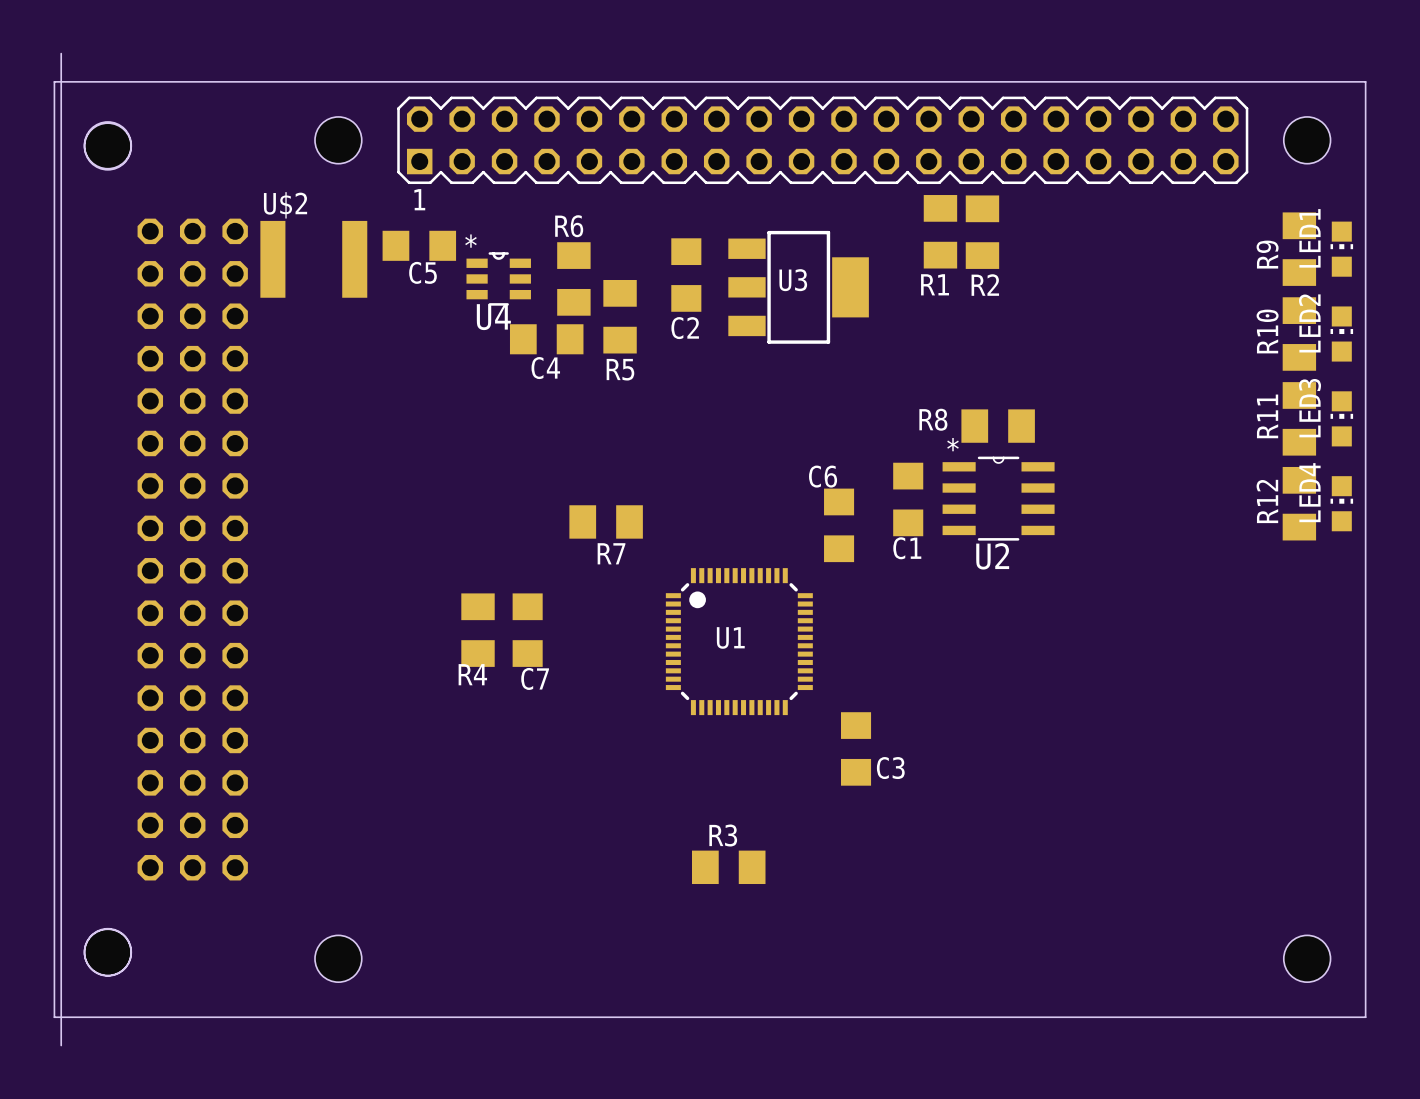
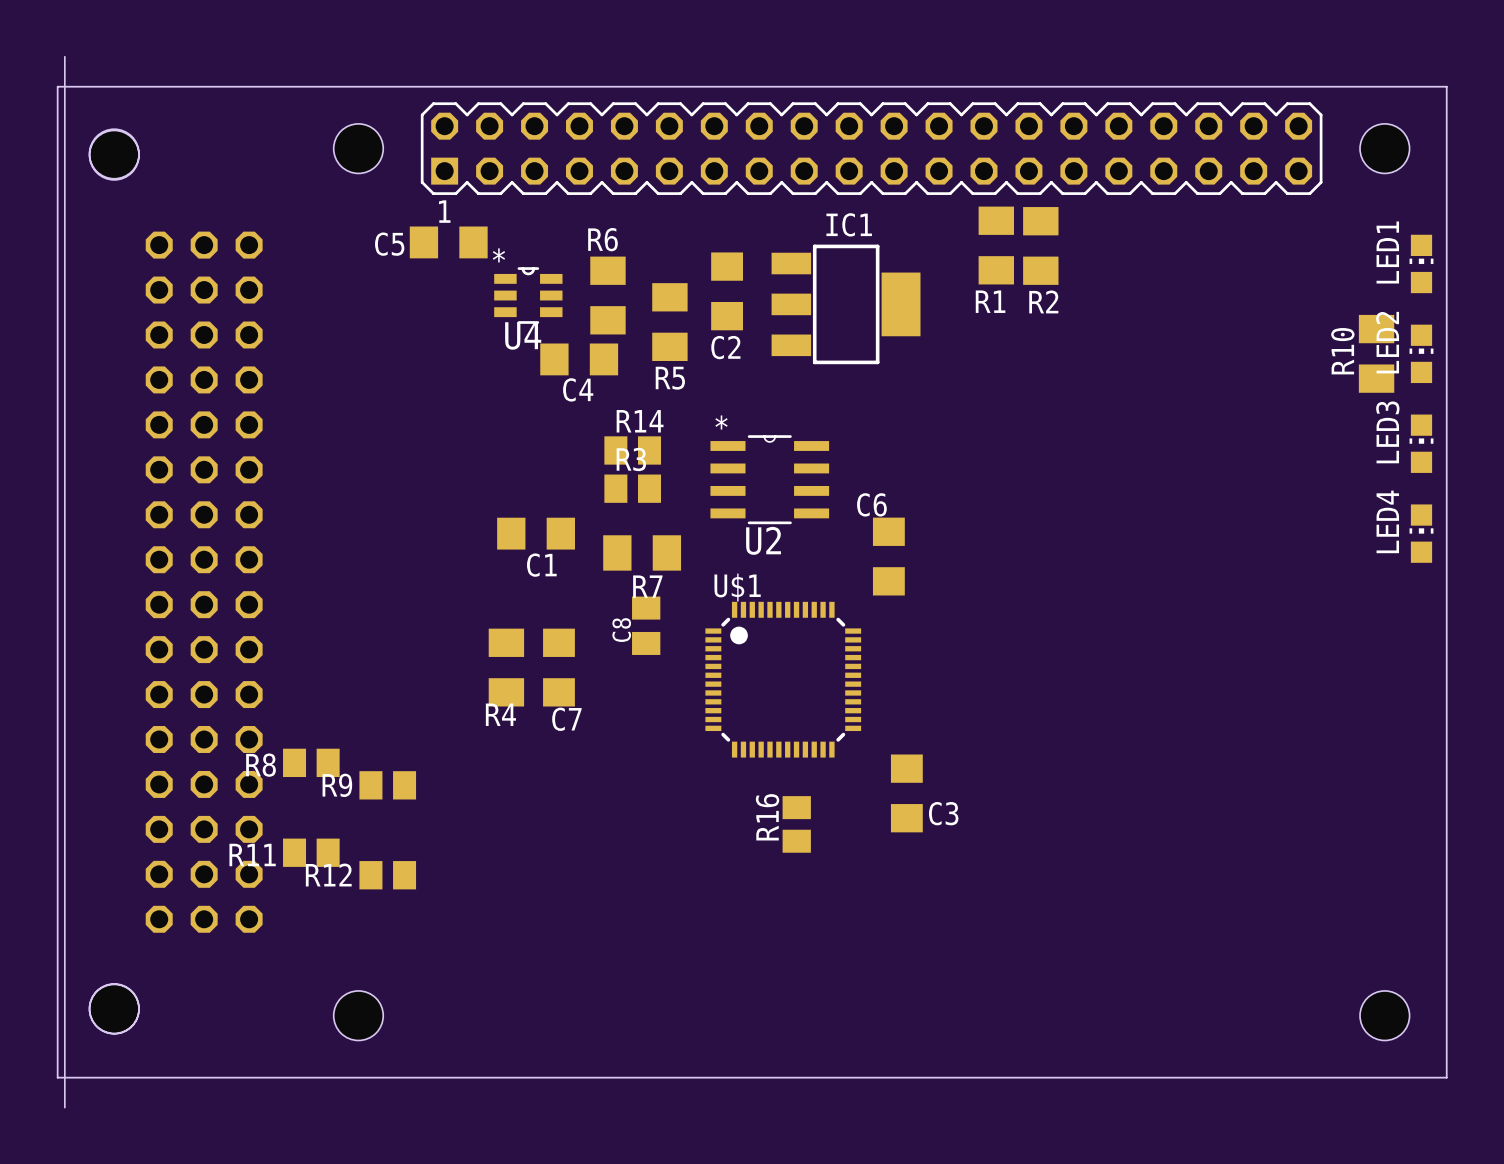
R9 footprint: [1282, 212, 1317, 286] -> [359, 771, 417, 800]
C5 position: (419, 245) -> (448, 242)
U$2: (313, 259) -> none
C5 name position: C5 (423, 272) -> C5 (389, 244)
U3 name: U3 (793, 280) -> IC1 (849, 224)
R5 position: (620, 316) -> (669, 322)
R11 footprint: [1282, 382, 1317, 456] -> [283, 838, 340, 867]
R8 footprint: [961, 409, 1035, 443] -> [283, 748, 340, 778]
R11 name position: R11 (1267, 416) -> R11 (252, 854)
R14: none -> (632, 450)
R12 footprint: [1282, 466, 1317, 541] -> [359, 861, 417, 890]
U2 position: (998, 498) -> (769, 479)
C1 rotation: 0° (908, 499) -> 90° clockwise (536, 533)
C1 position: (908, 499) -> (536, 533)
R12 name position: R12 (1267, 501) -> R12 (328, 875)
C8: none -> (646, 625)
U1 name: U1 (730, 637) -> U$1 (737, 587)
R16: none -> (796, 824)
R3 footprint: [692, 850, 766, 885] -> [604, 474, 662, 503]

